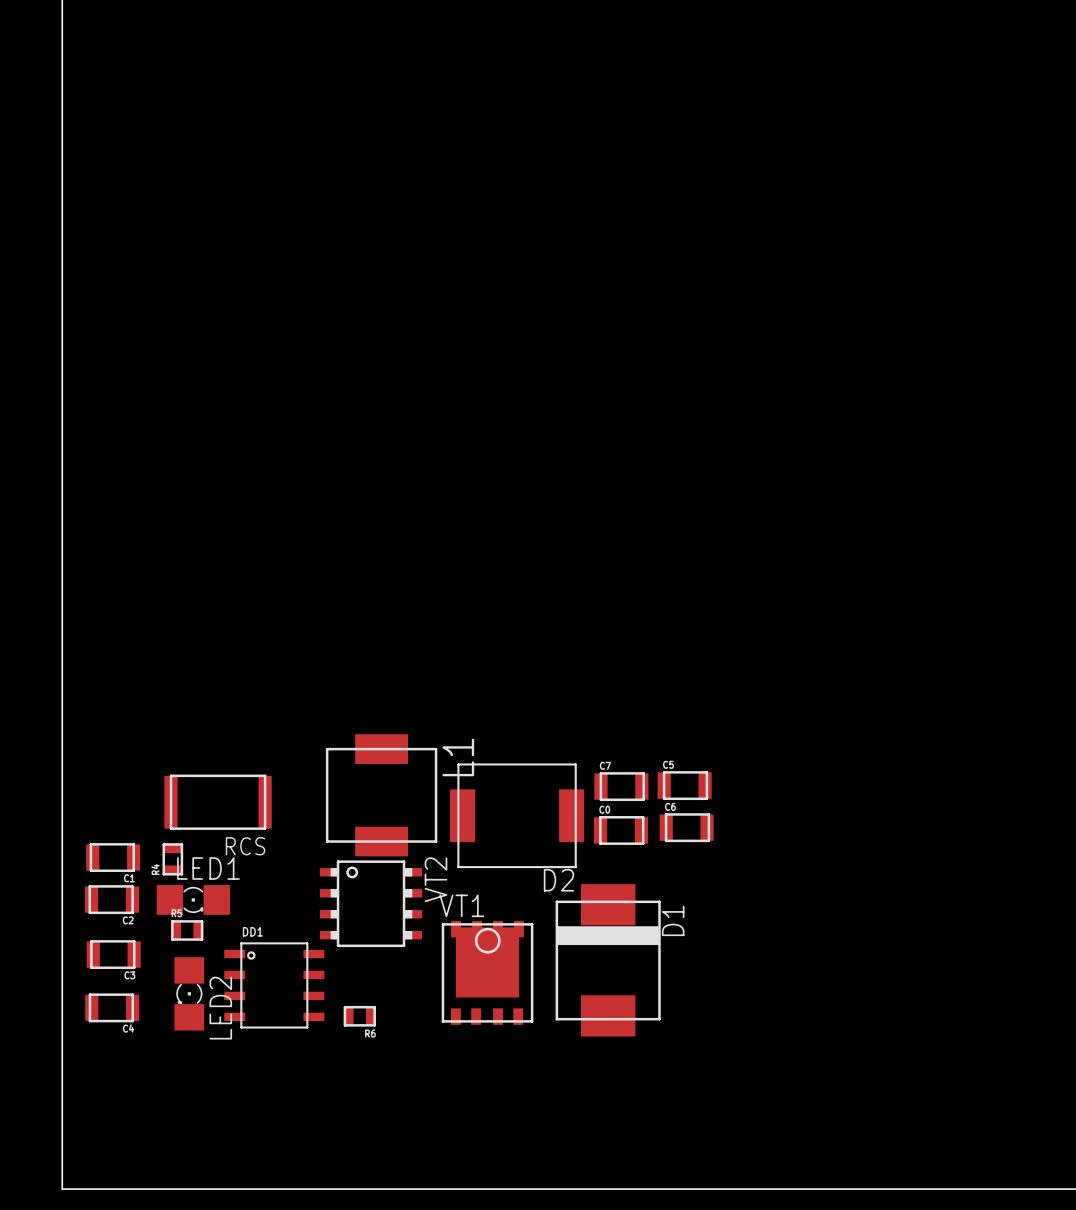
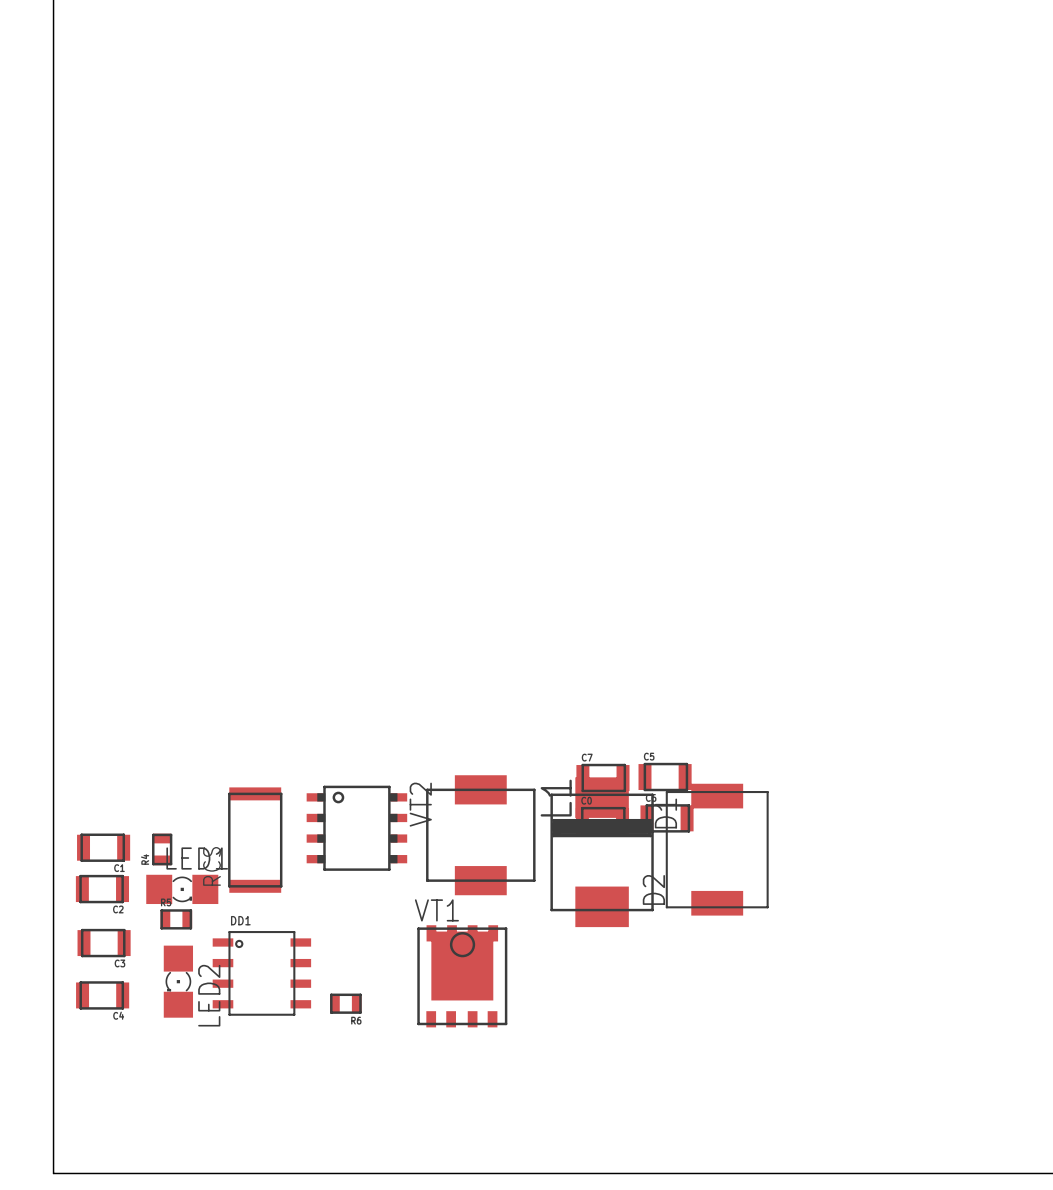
L1 position: (381, 795) -> (480, 835)
RCS rotation: 0° (218, 802) -> 90° clockwise (255, 840)
RCS position: (218, 802) -> (255, 840)
D2 rotation: 0° (517, 815) -> 90° clockwise (717, 849)
D2 position: (517, 815) -> (717, 849)
VT2 position: (371, 903) -> (356, 828)
D1 position: (608, 960) -> (602, 852)
VT1 position: (487, 972) -> (462, 976)

